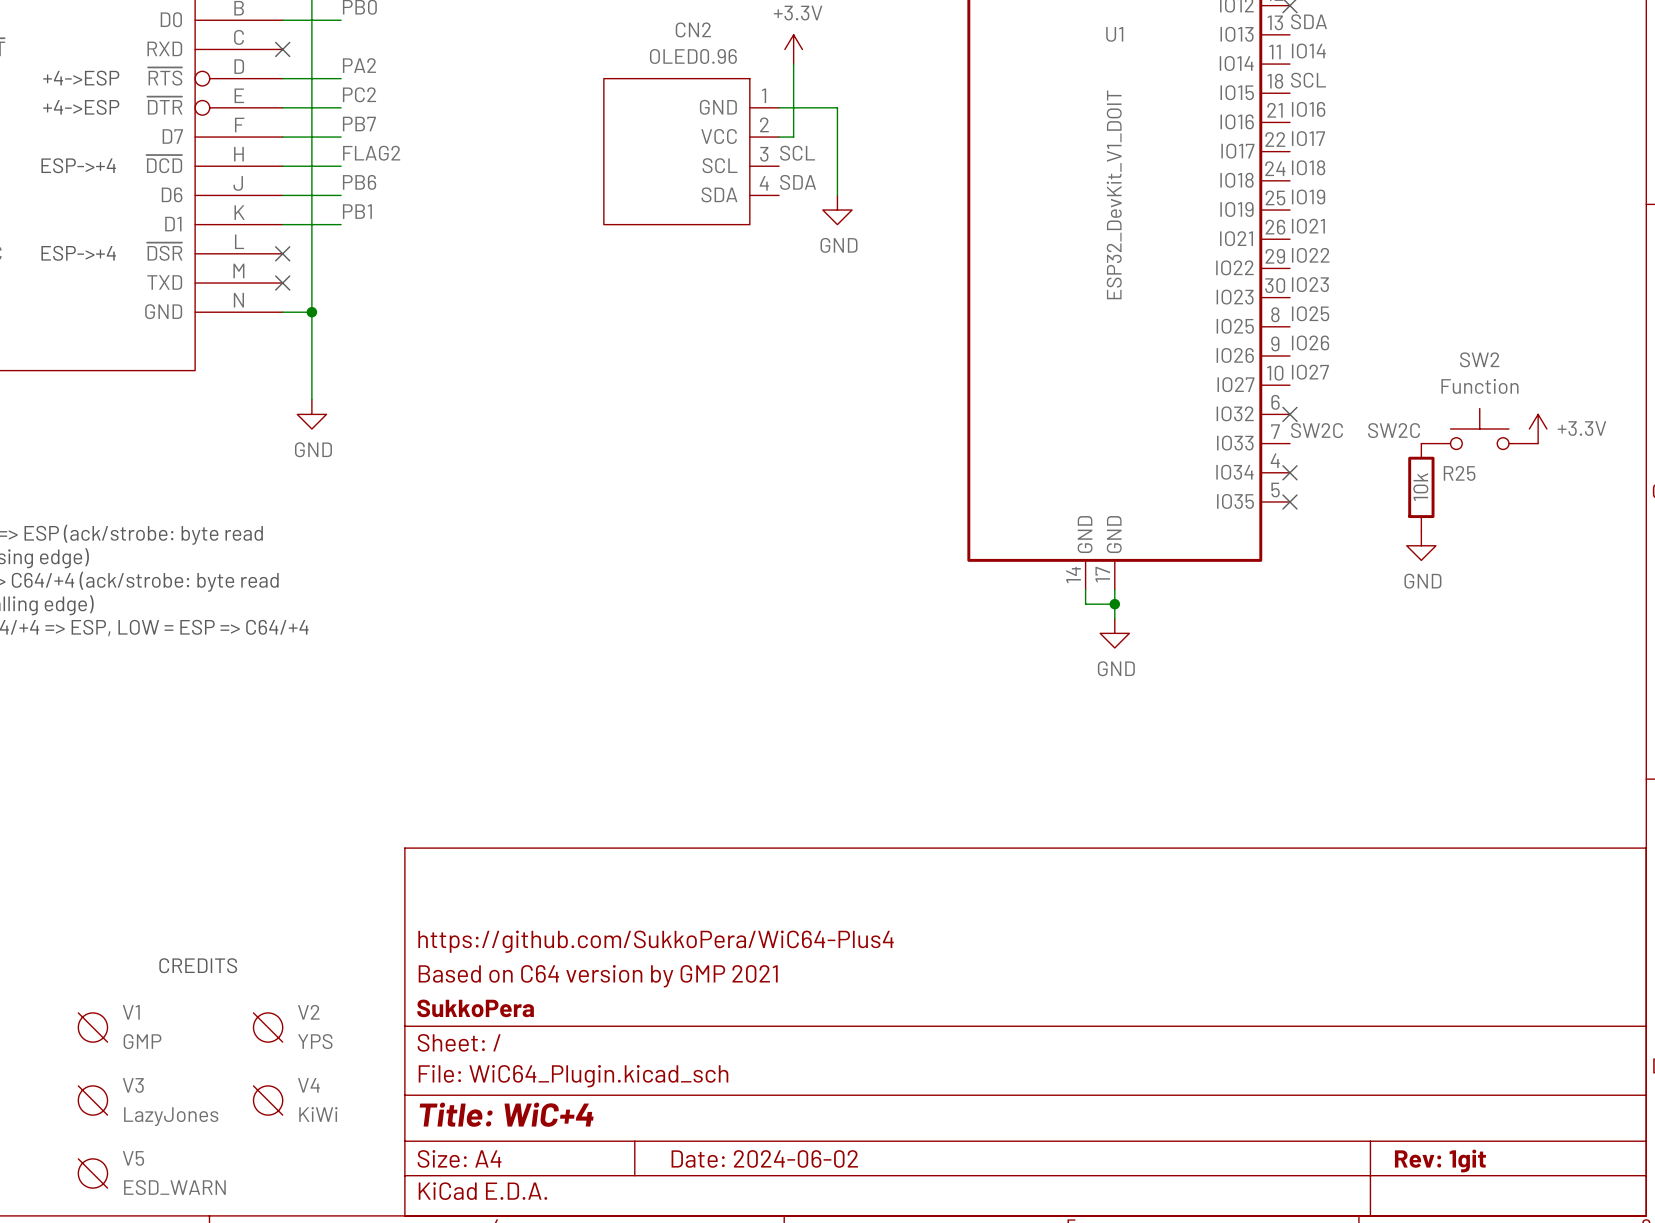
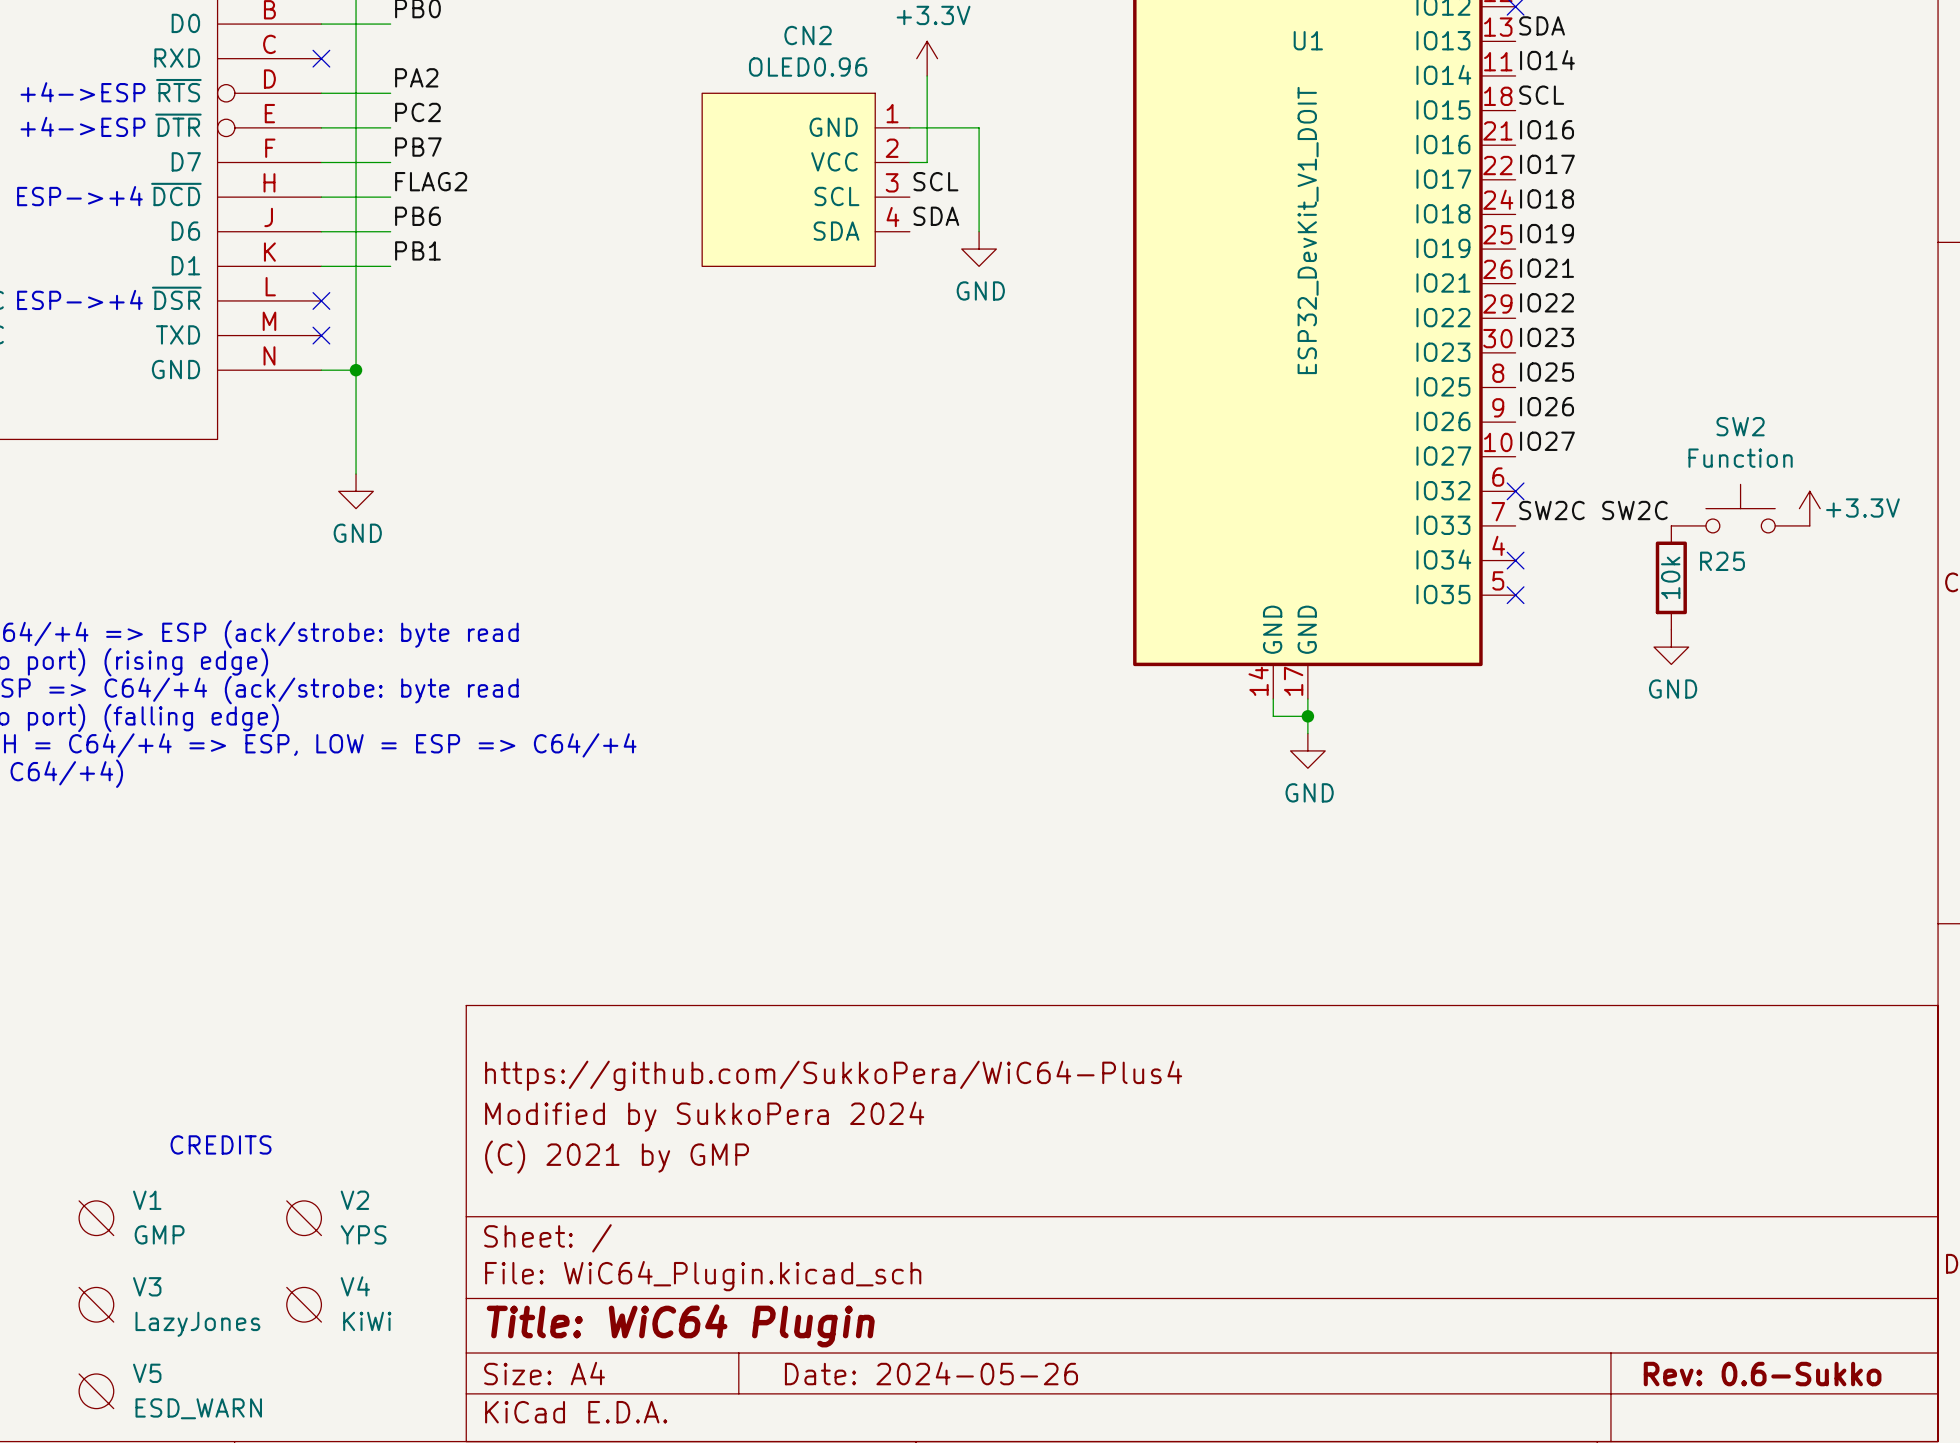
title block: none -> https://github.com/SukkoPera/WiC64-Plus4 (833, 1075)
title block: https://github.com/SukkoPera/WiC64-Plus4 (656, 941) -> Modified by SukkoPera 2024 (704, 1116)
title block: Based on C64 version by GMP 2021 (598, 976) -> (C) 2021 by GMP (617, 1157)
title block: SukkoPera (475, 1008) -> none
title block: Title: WiC+4 (506, 1114) -> Title: WiC64 Plugin (680, 1325)
title block: Date: 2024-06-02 (764, 1158) -> Date: 2024-05-26 (931, 1373)
title block: Rev: 1git (1440, 1161) -> Rev: 0.6-Sukko (1762, 1374)

